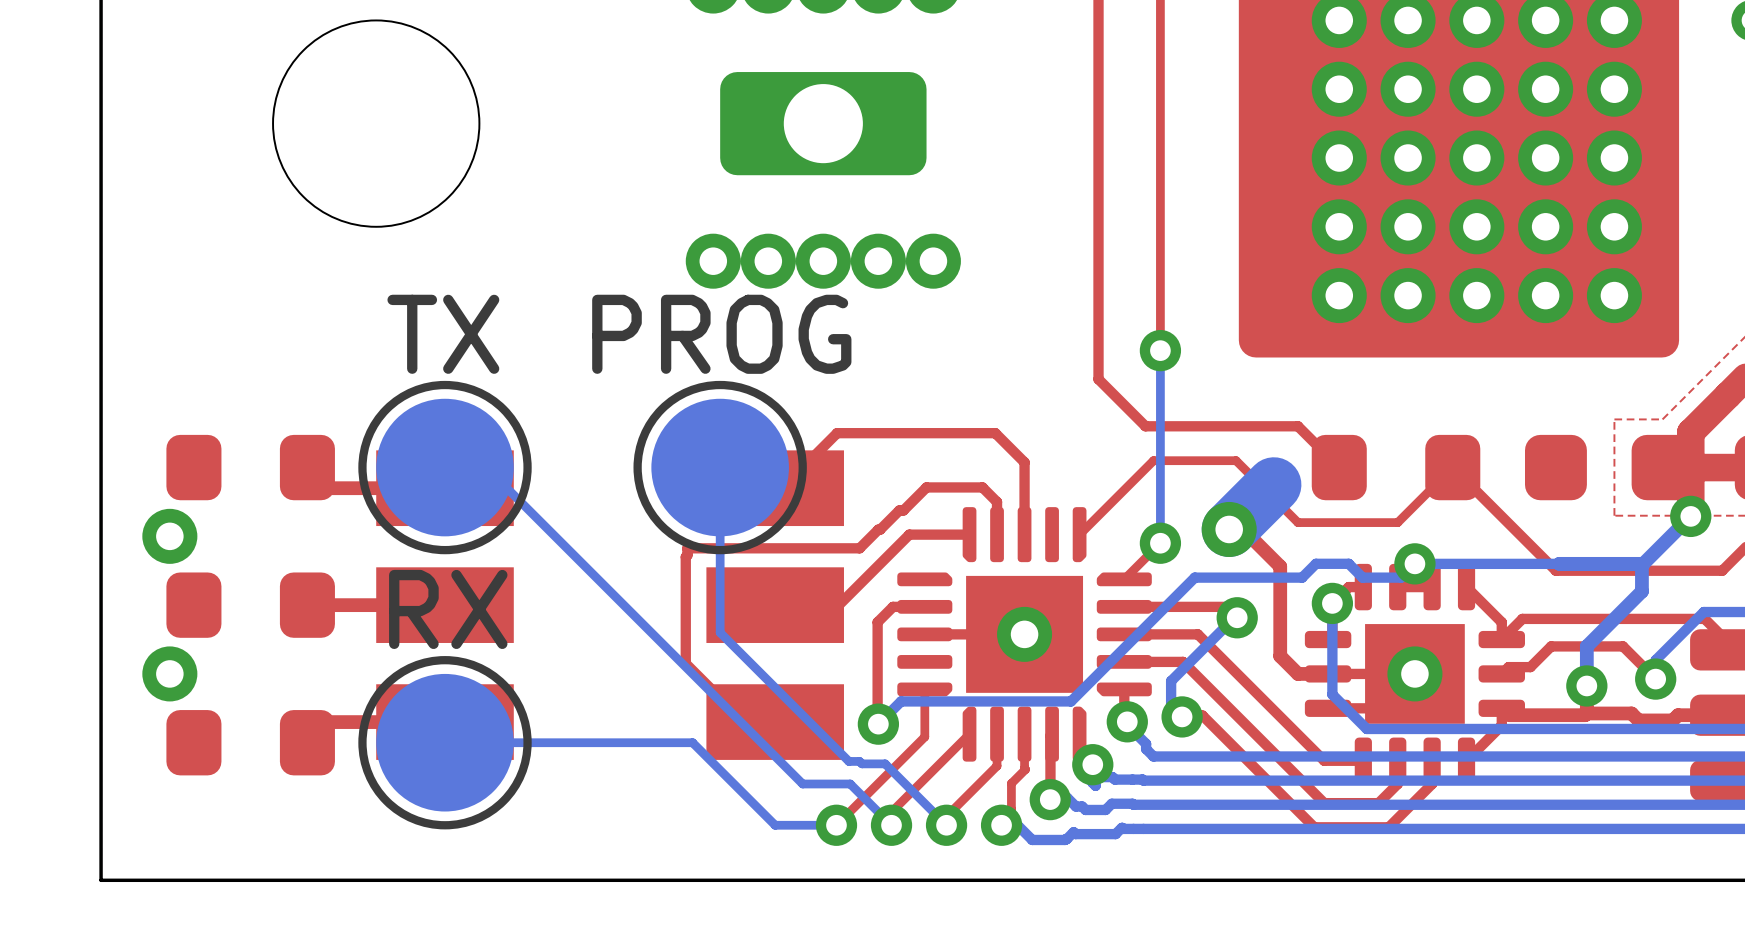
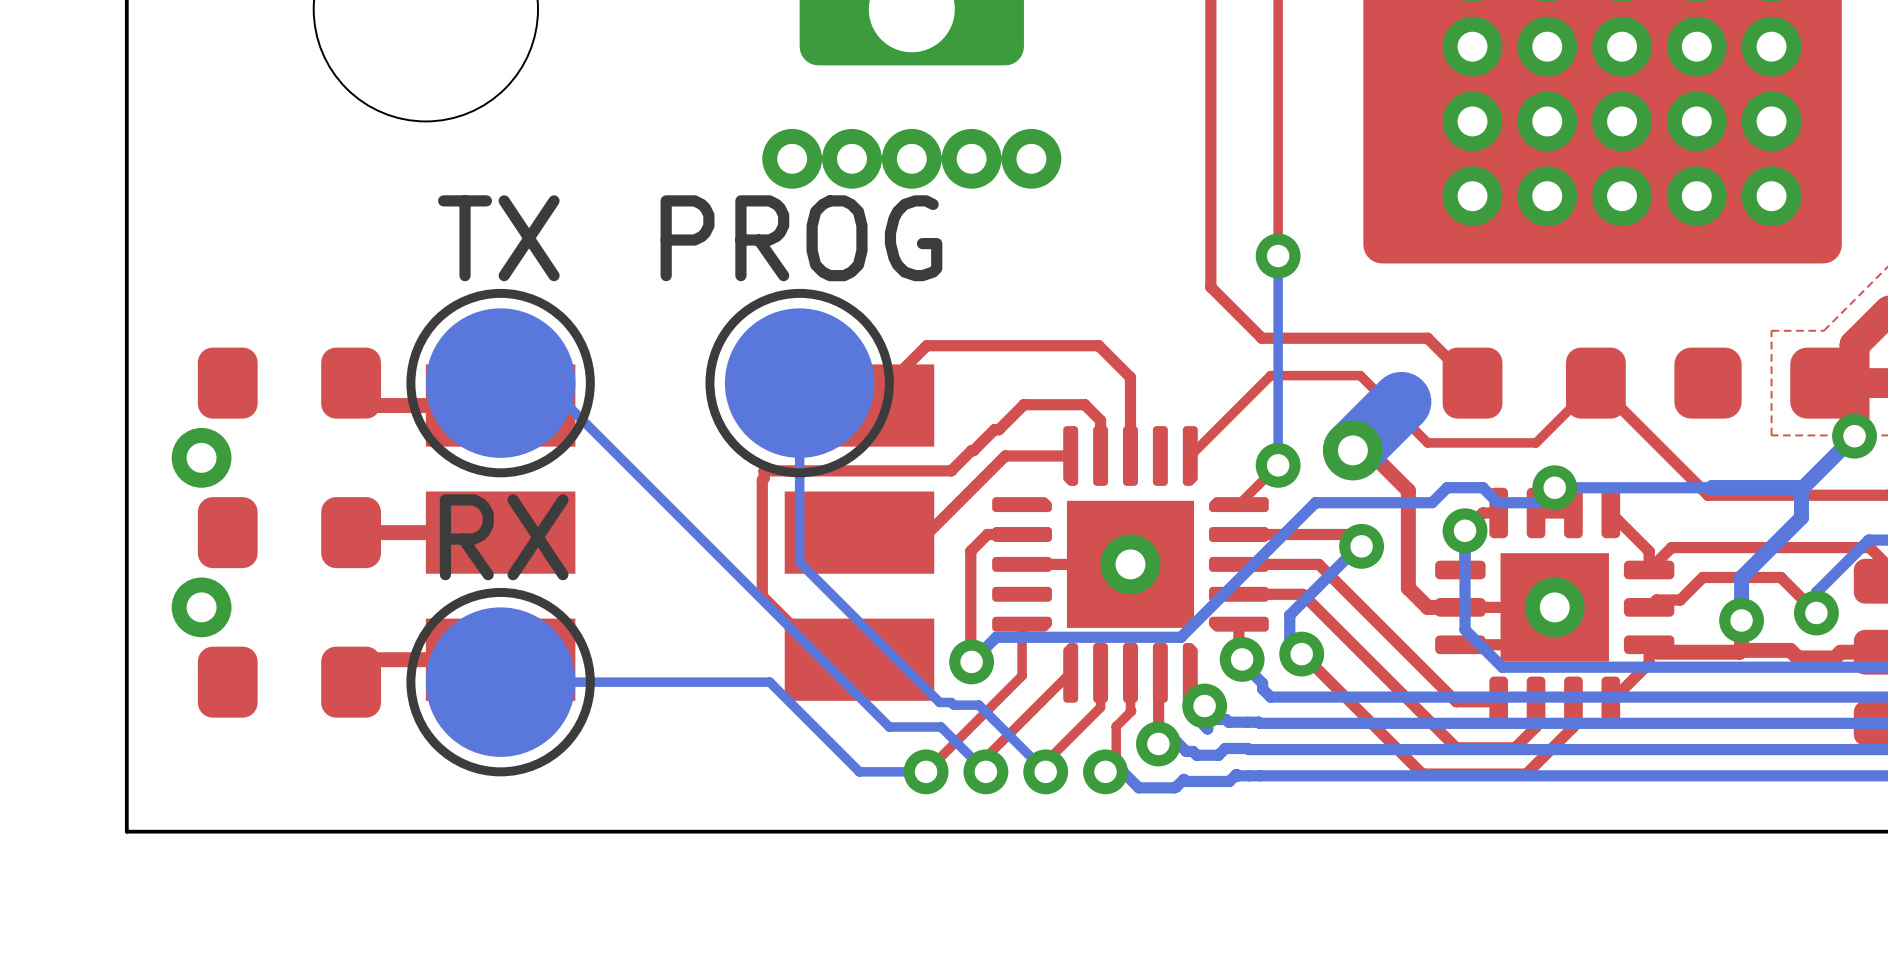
top track: (1182, 716) (1202, 715) (1314, 827) -> (1308, 660) (1422, 774) (1445, 774)

